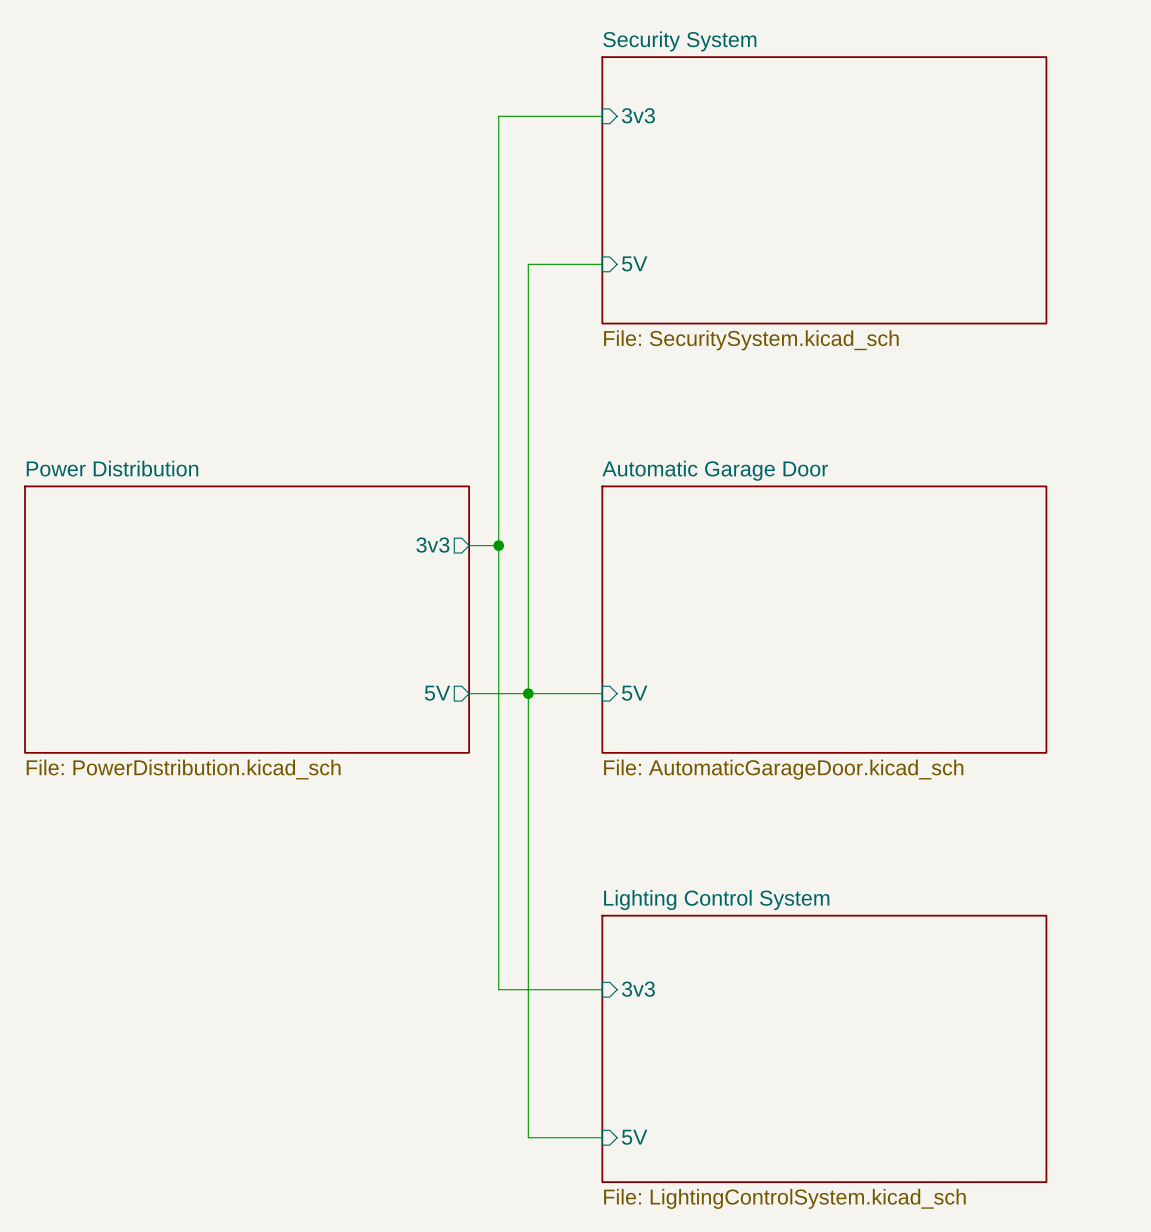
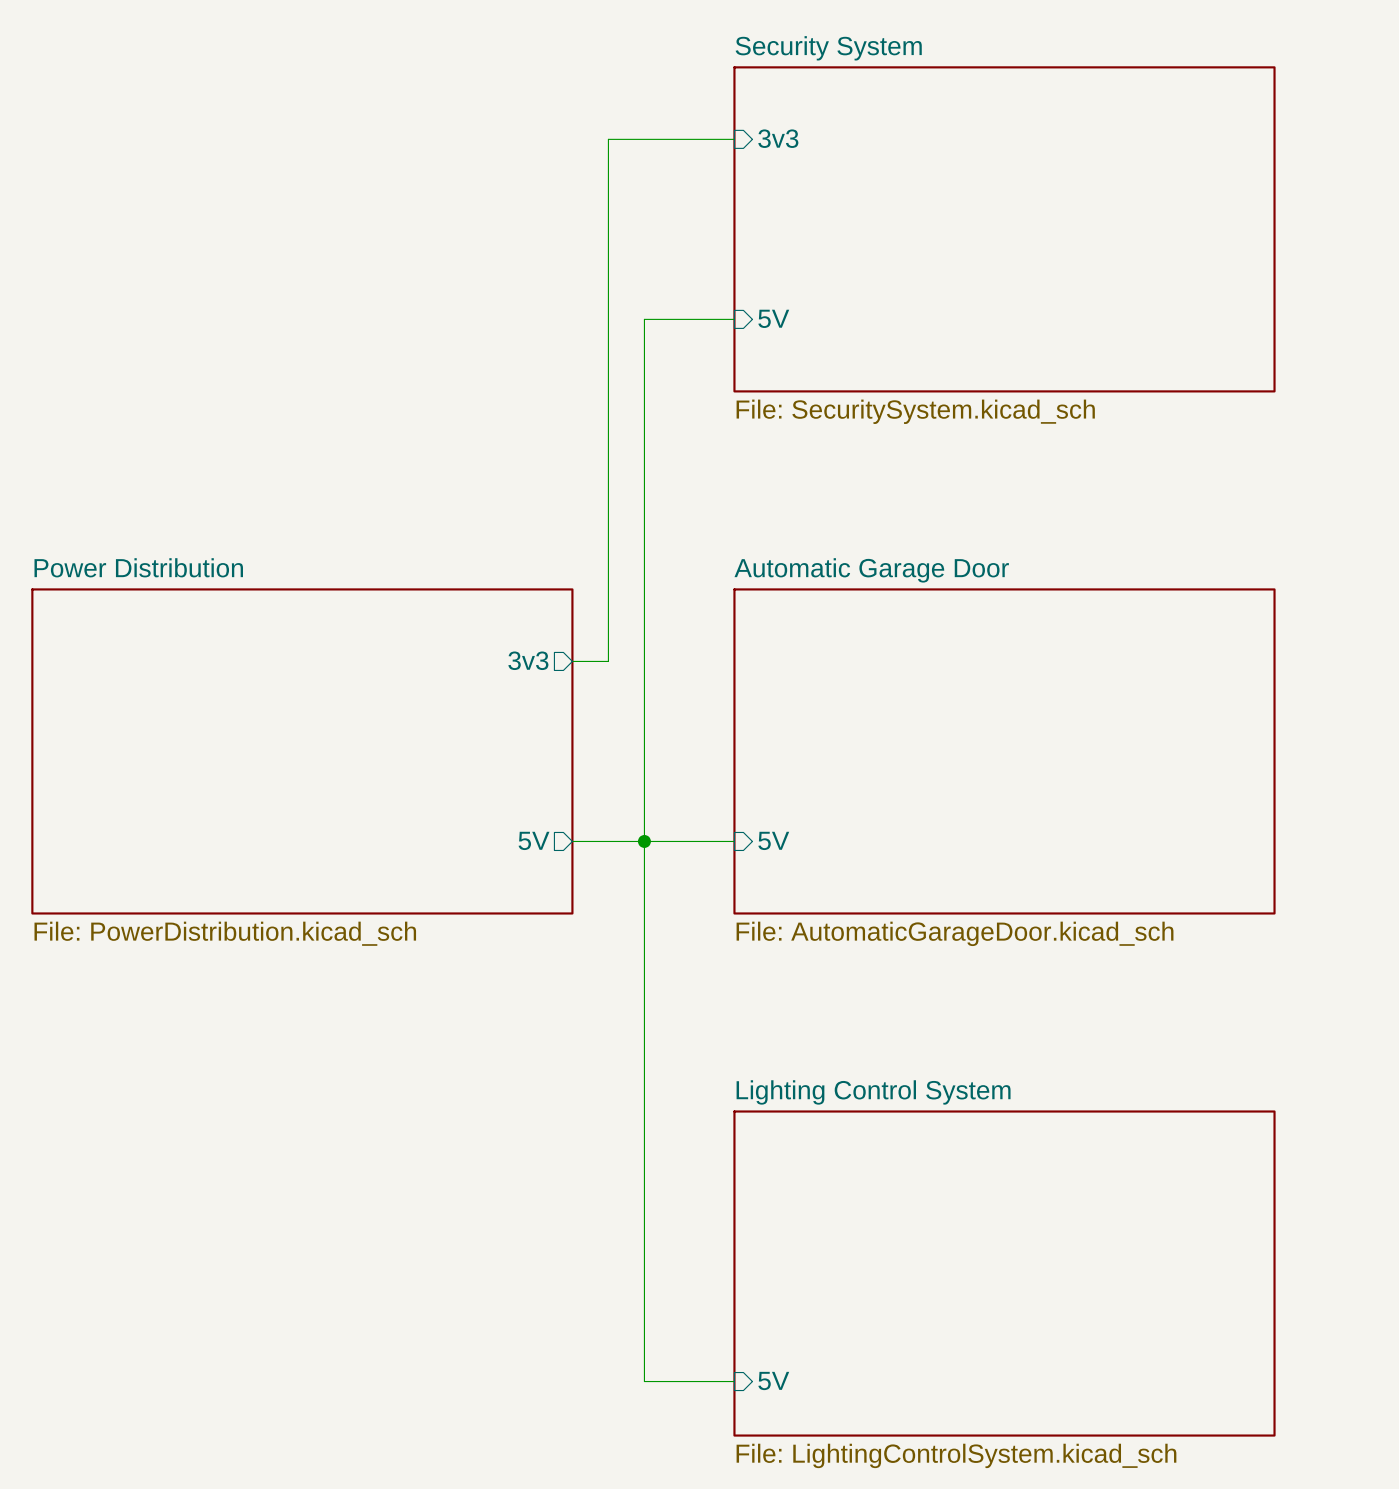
wire: (498, 545) (498, 989) (602, 989) -> none
junction: (498, 545) -> none
sheet pin: 3v3 (638, 989) -> none

